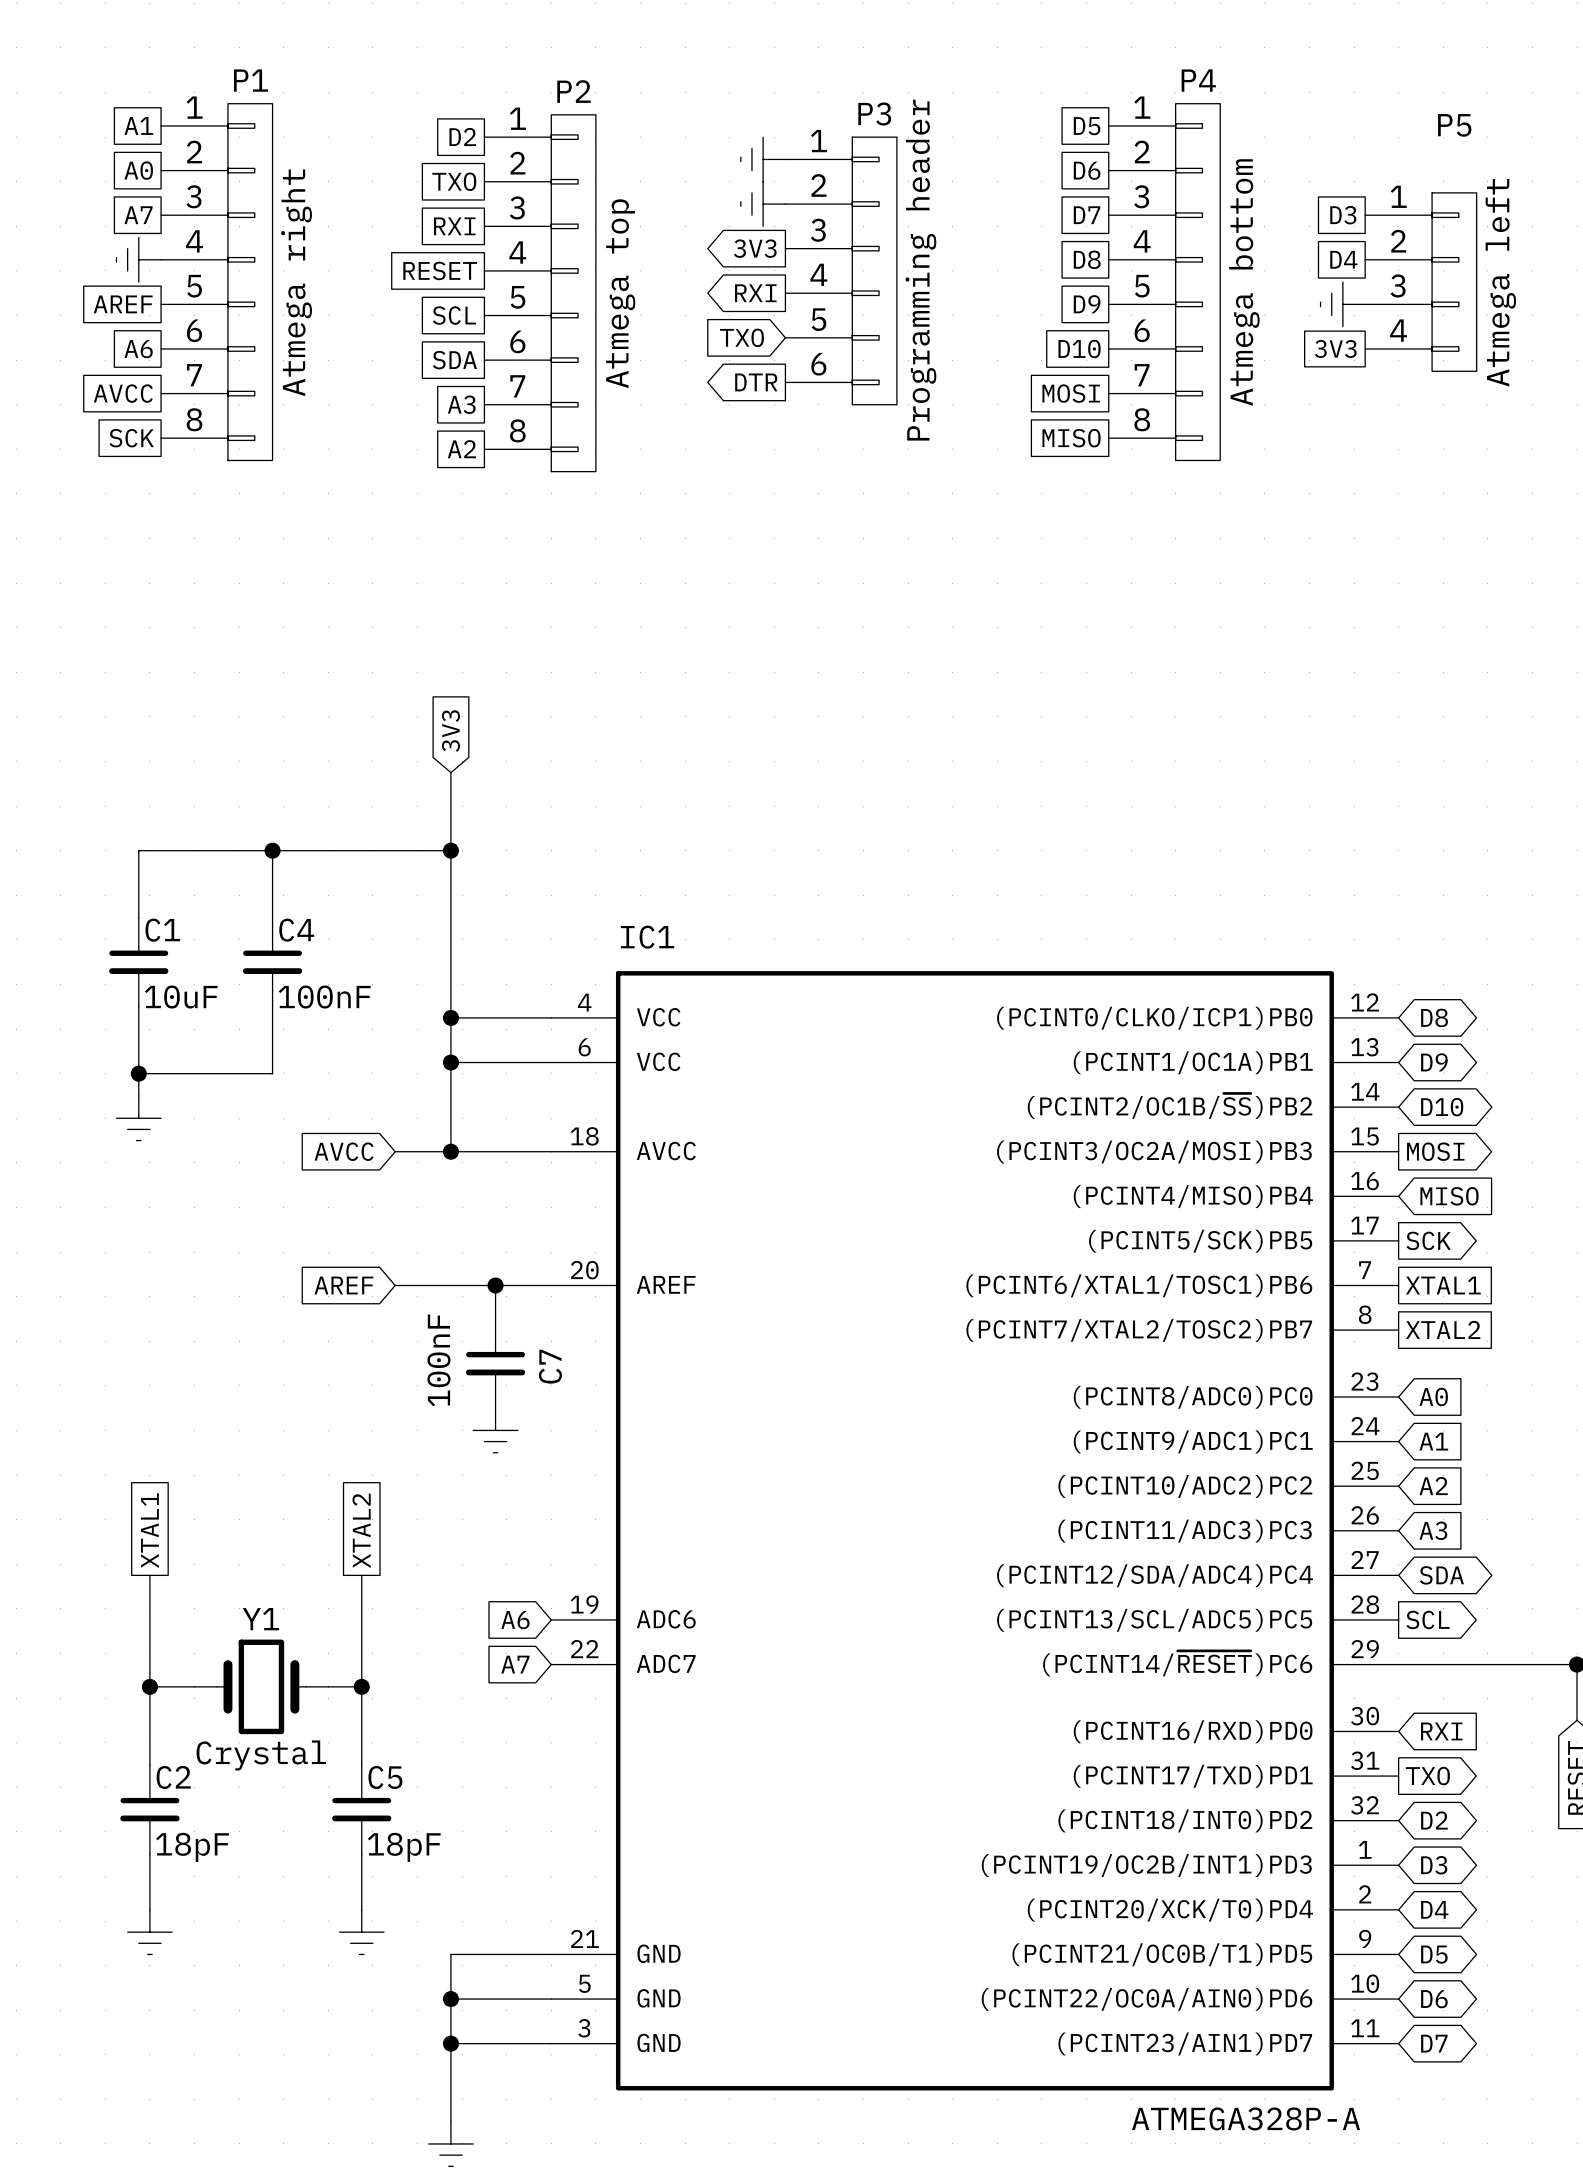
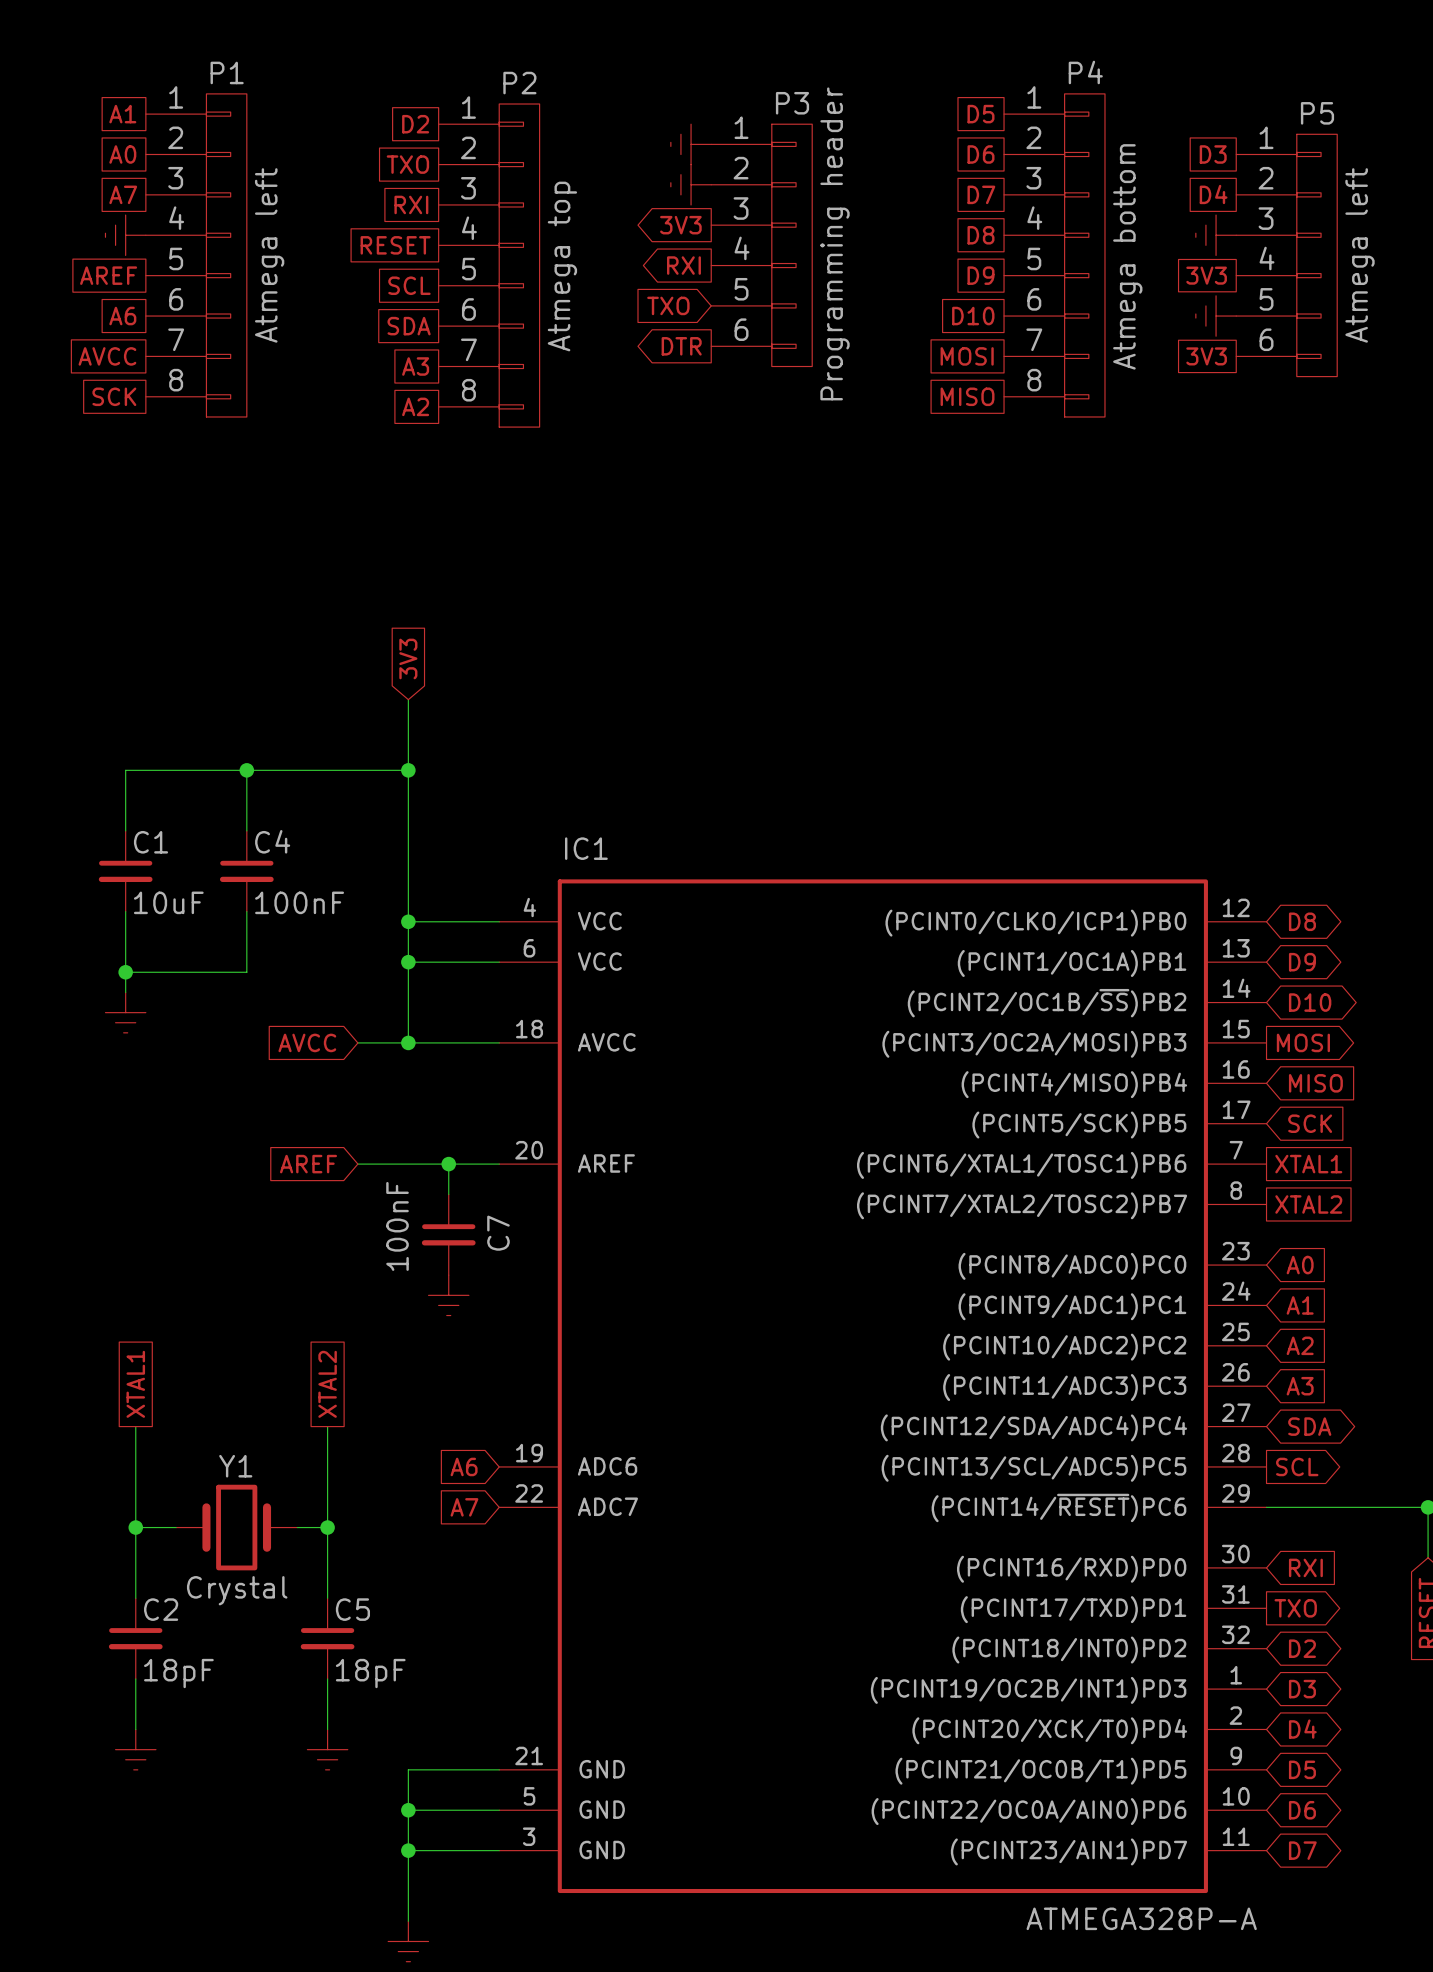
global label: none -> D3 (1213, 154)
P5 symbol: [1365, 192, 1477, 372] -> [1236, 134, 1338, 377]
global label: D3 (1343, 215) -> D4 (1213, 194)
power symbol: none -> (1216, 235)
global label: D4 (1343, 259) -> none
P1 value: Atmega right (296, 282) -> Atmega left (269, 255)
global label: none -> 3V3 (1206, 275)
power symbol: (1342, 304) -> none
global label: 3V3 (1335, 348) -> none
power symbol: none -> (1216, 316)
global label: none -> 3V3 (1206, 356)
global label shape: output (1428, 1240) -> input (1310, 1123)

